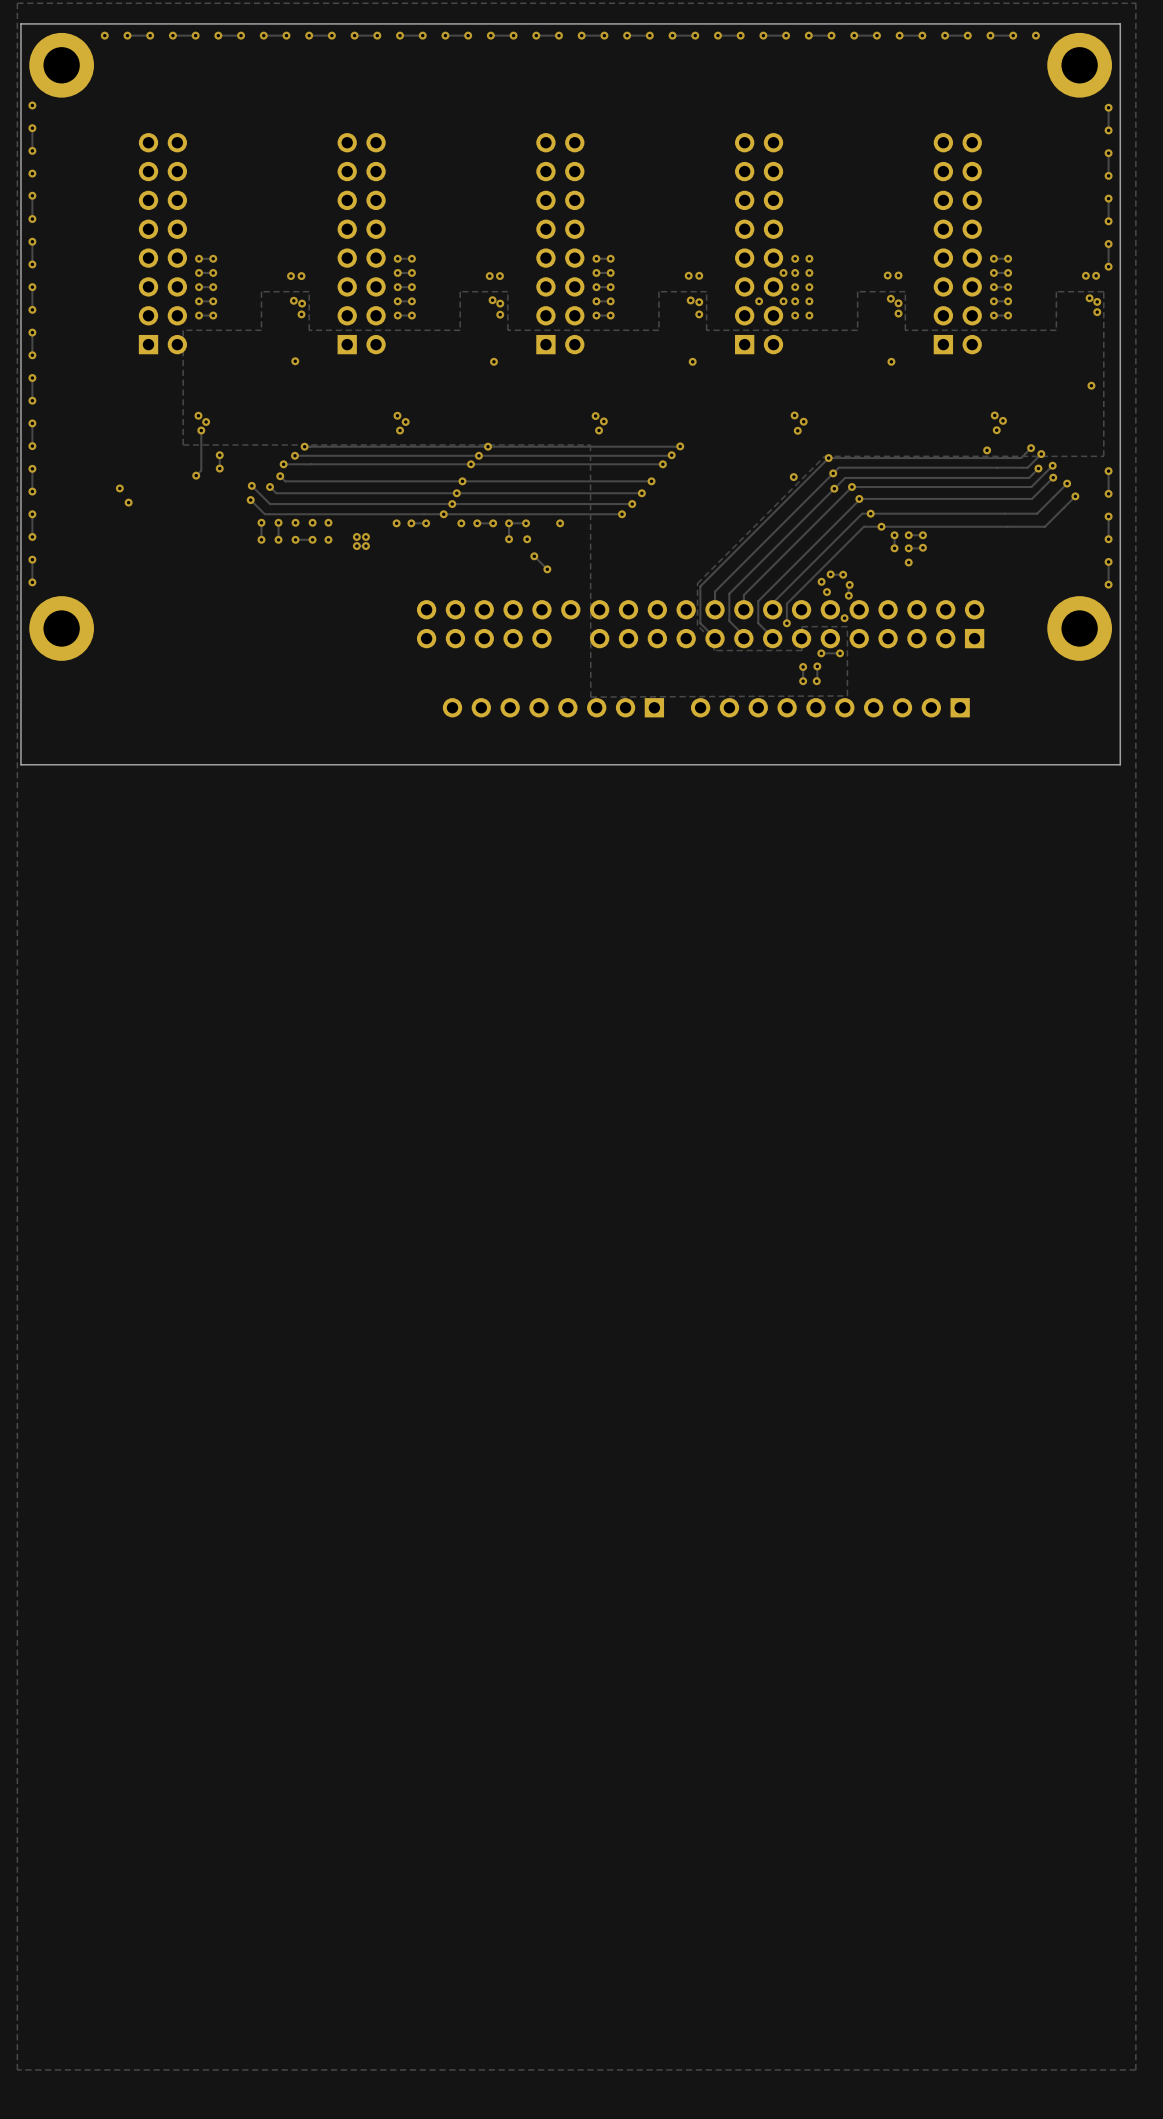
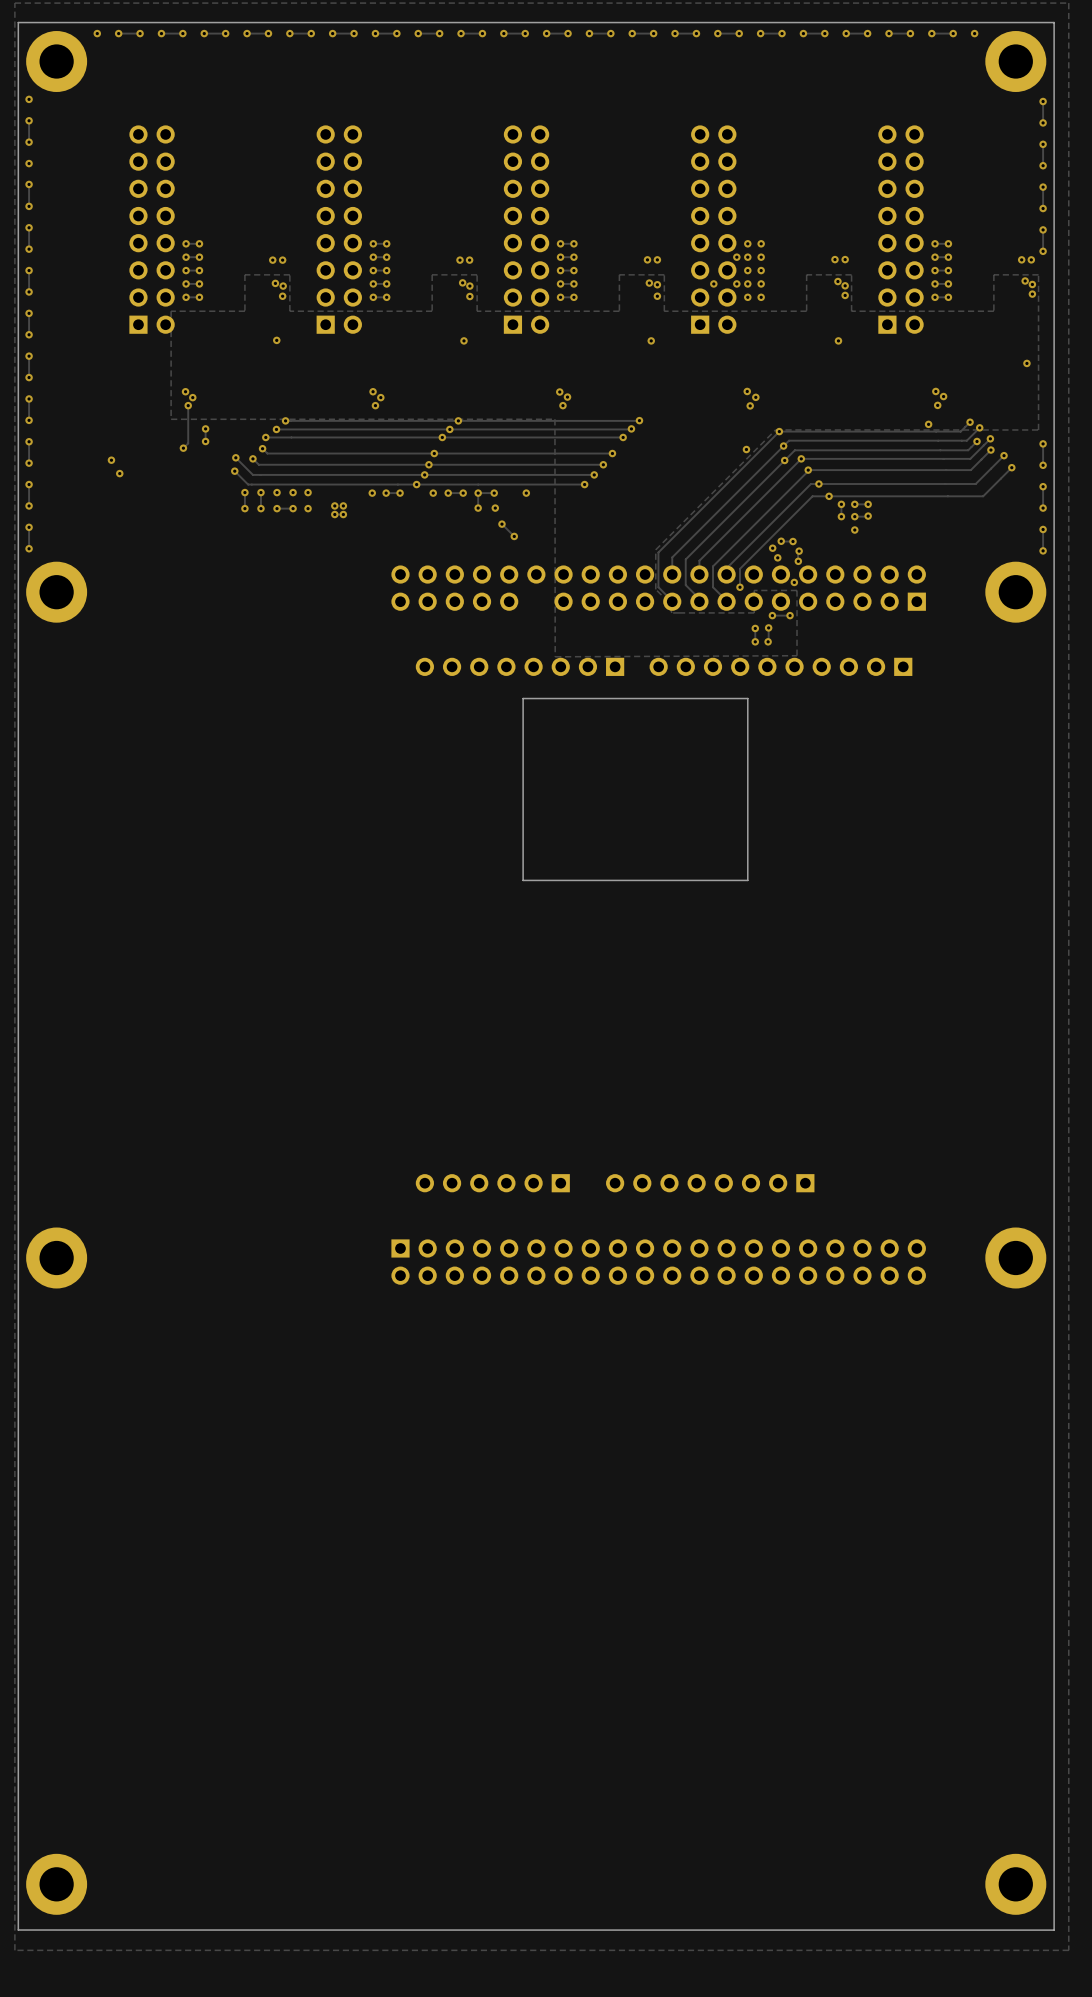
board edge: none -> (747, 698) (747, 880) (523, 880) (523, 698) (747, 698)
board edge: (1120, 764) (20, 764) -> (1054, 1930) (18, 1930) (18, 720)
board edge: none -> (1054, 720) (1054, 1930)
part: none -> (492, 1183)
part: none -> (710, 1183)
part: none -> (56, 1257)
part: none -> (1015, 1257)
part: none -> (658, 1262)
part: none -> (56, 1884)
part: none -> (1015, 1884)

